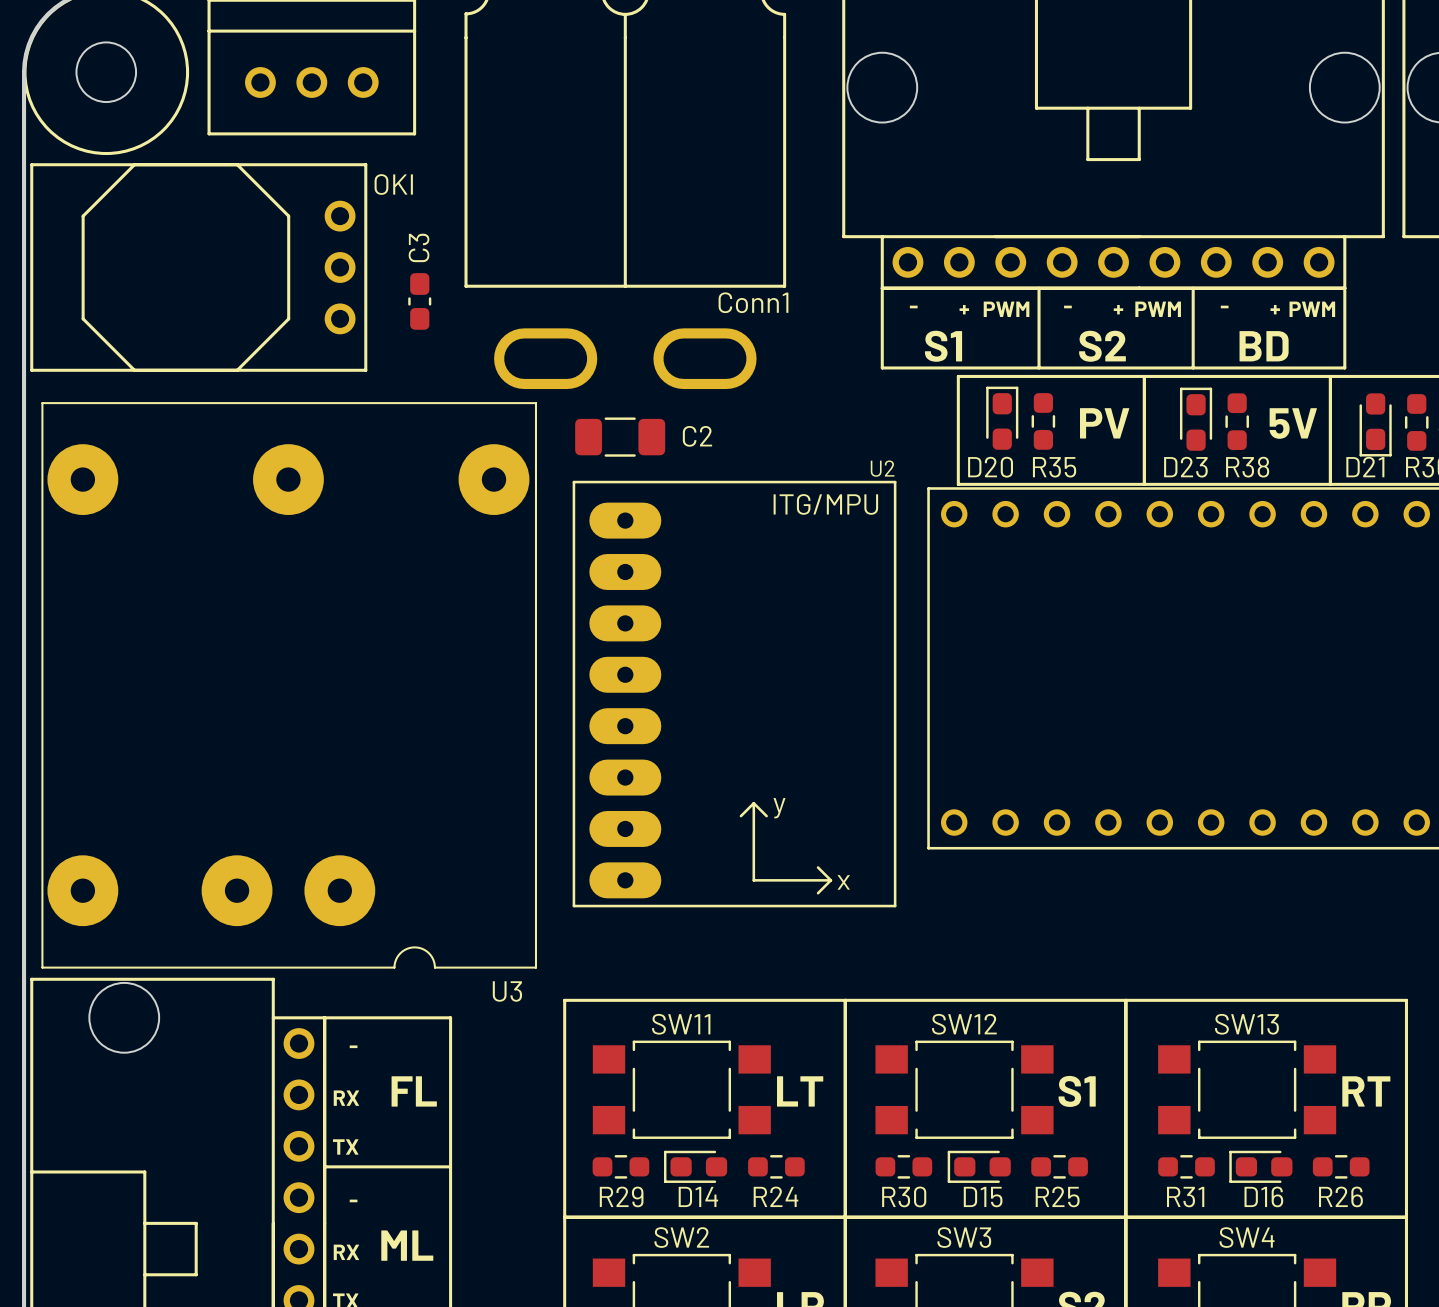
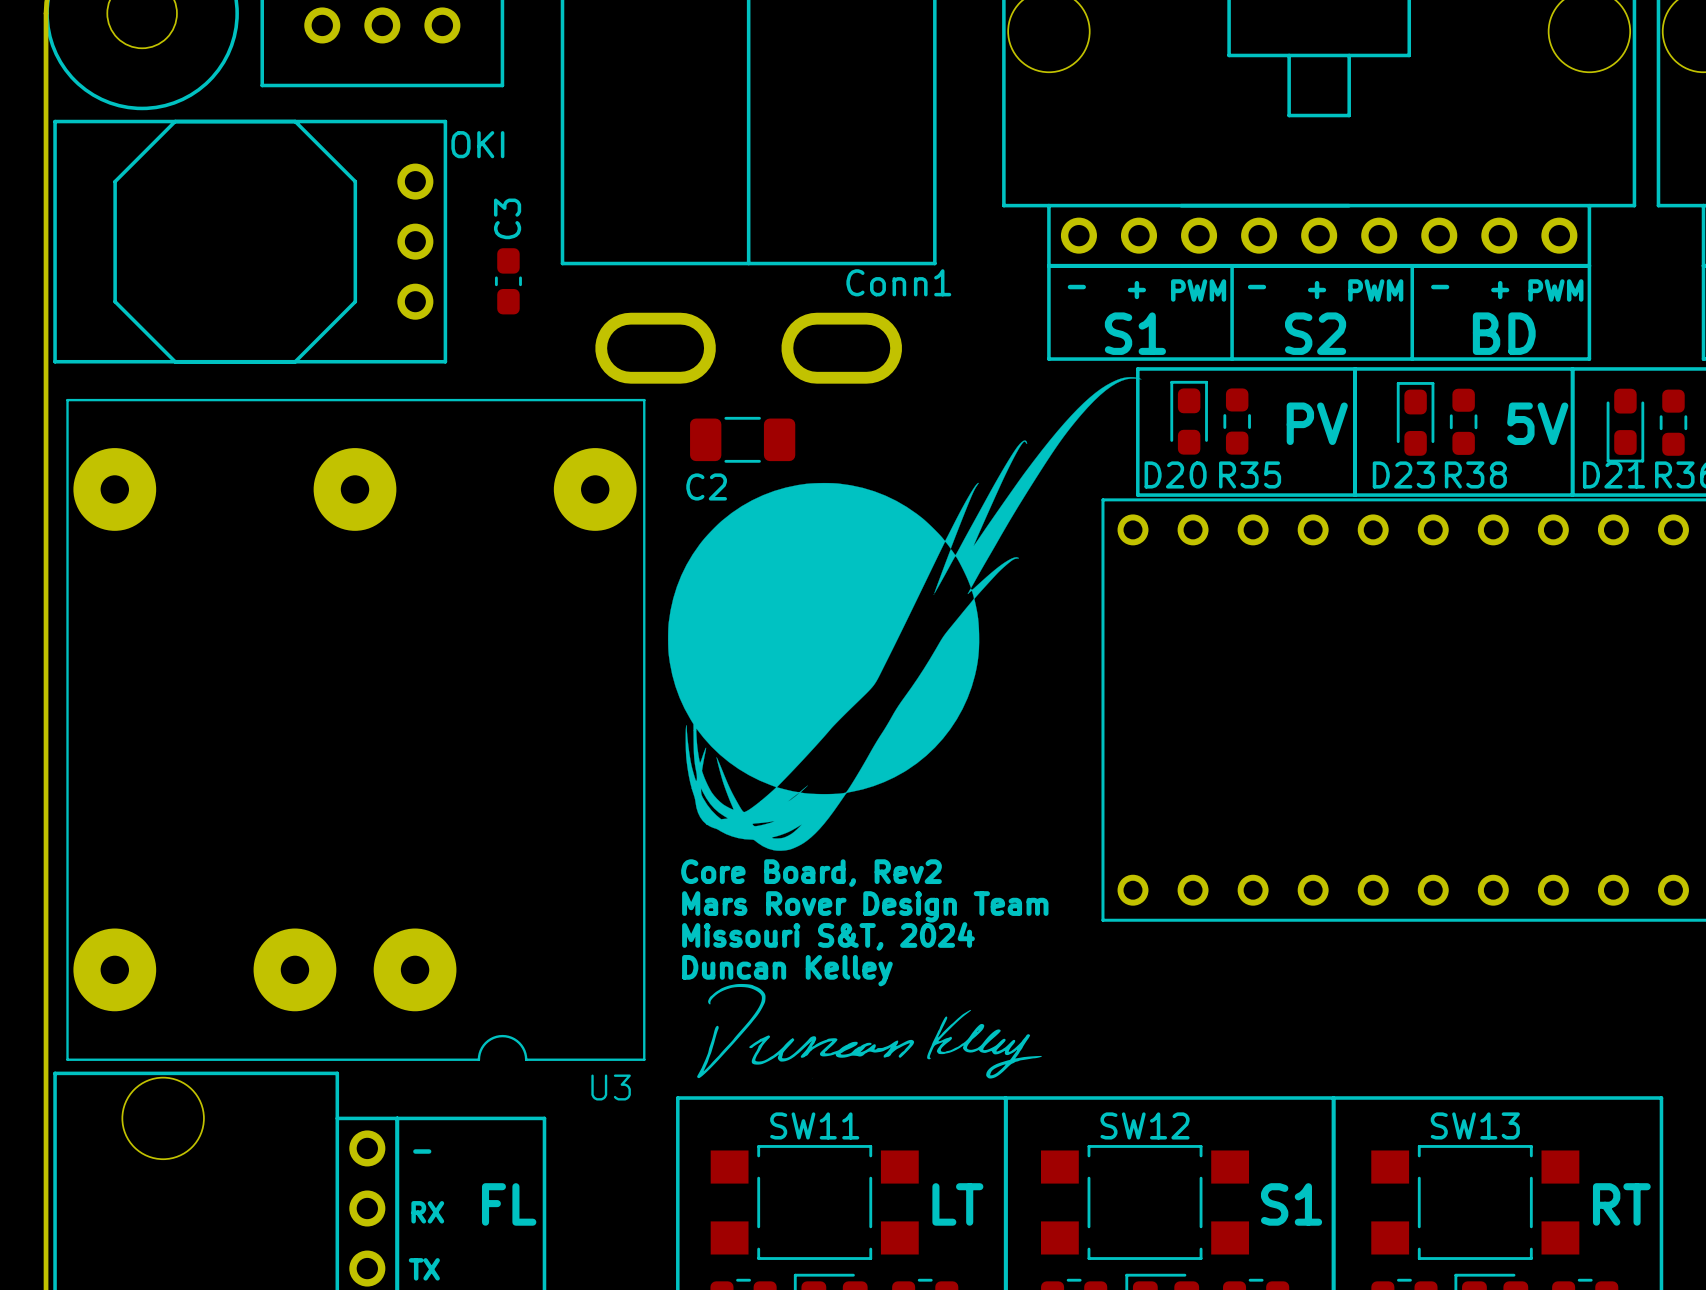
drawing: none -> [668, 377, 1142, 851]
C2 name position: C2 (697, 436) -> C2 (706, 486)
U2: (734, 694) -> none
text: none -> Core Board, Rev2 (811, 873)
text: none -> Mars Rover Design Team (865, 906)
text: none -> Missouri S&T, 2024 (828, 936)
text: none -> Duncan Kelley (787, 970)
drawing: none -> [697, 983, 1042, 1079]

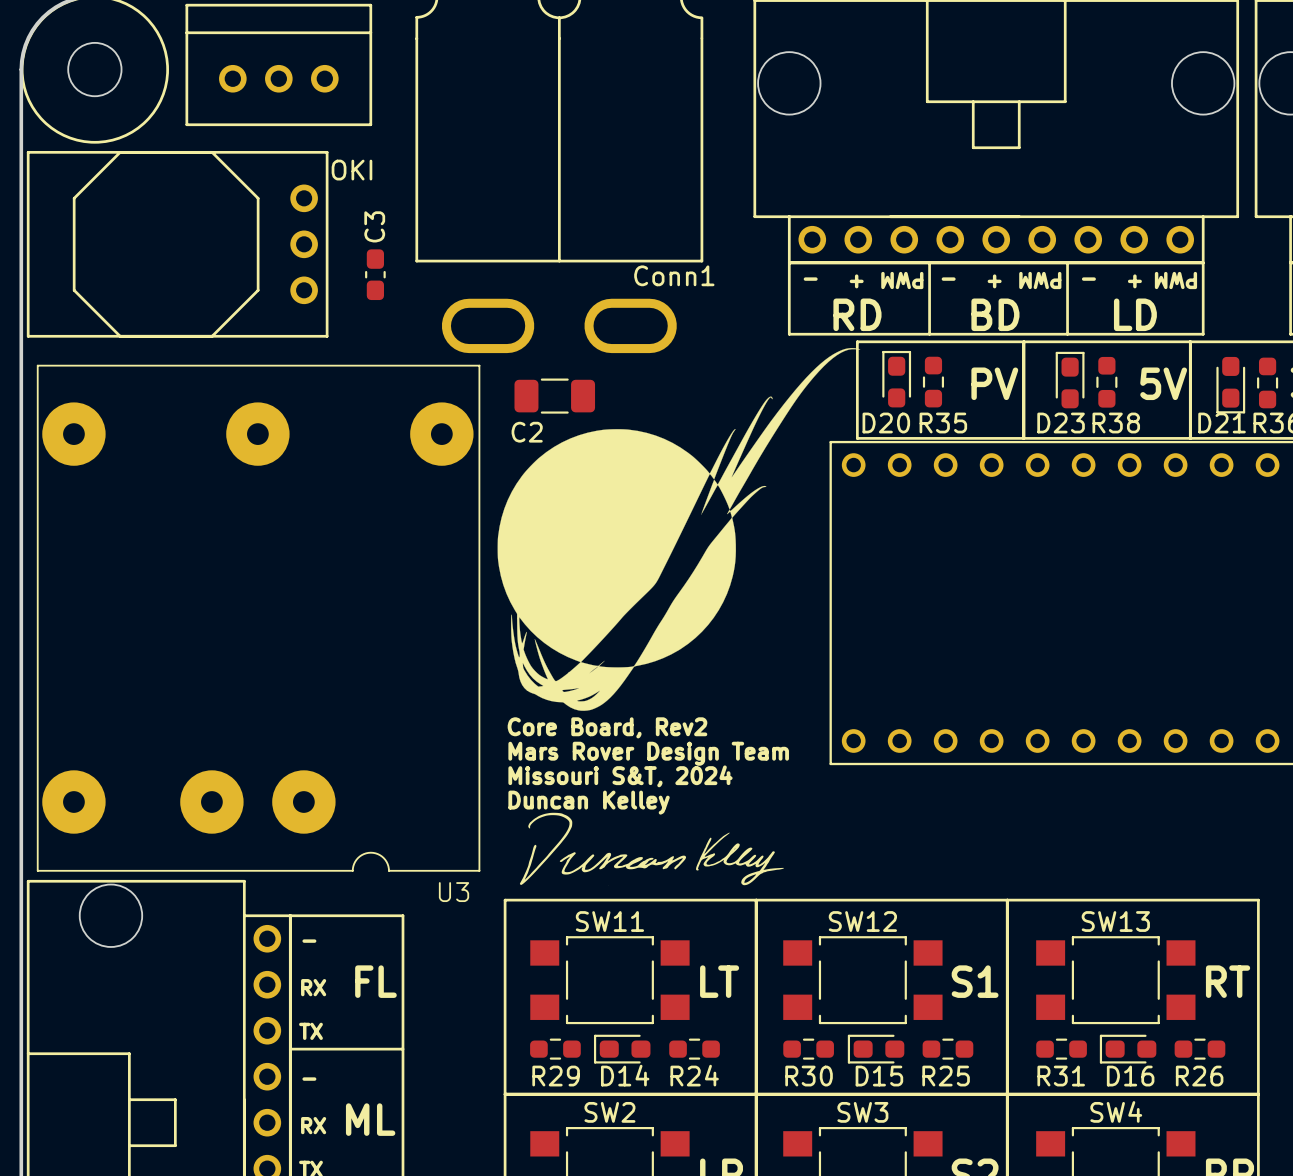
text rotation: 0° (1198, 290) -> 180° (902, 280)
text rotation: 0° (1375, 290) -> 180° (1040, 280)
text rotation: 0° (1555, 290) -> 180° (1175, 280)
text: S1 (1135, 333) -> RD (857, 314)
text: S2 (1315, 333) -> BD (995, 314)
text: BD (1504, 333) -> LD (1135, 314)

